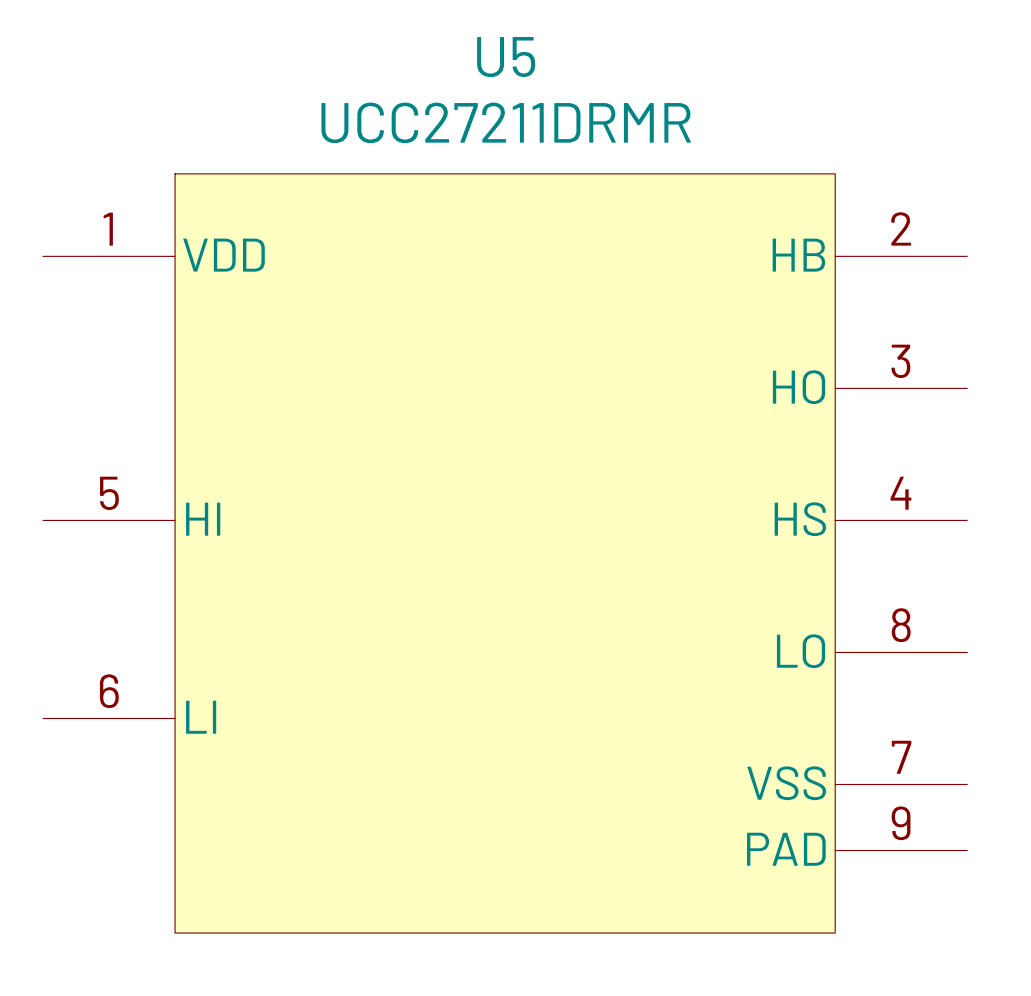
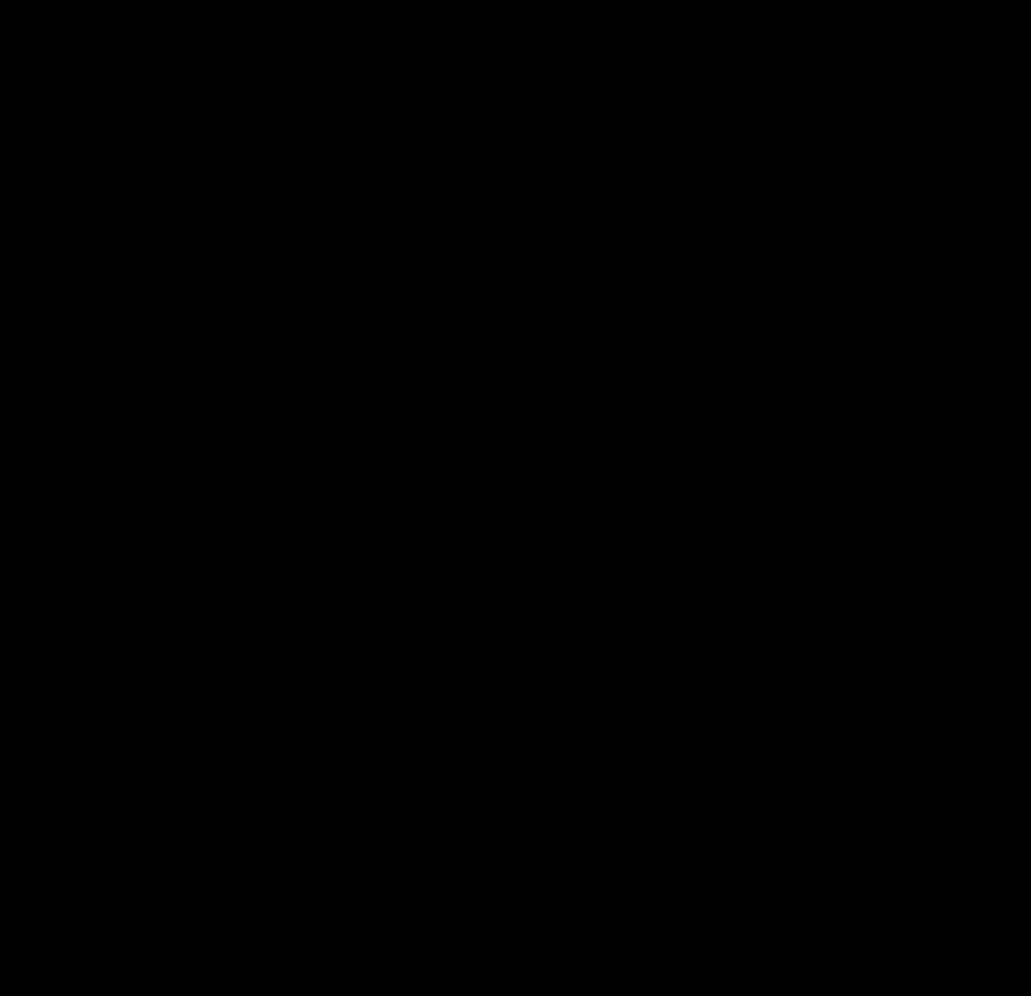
U5: UCC27211DRMR (505, 553) -> none

